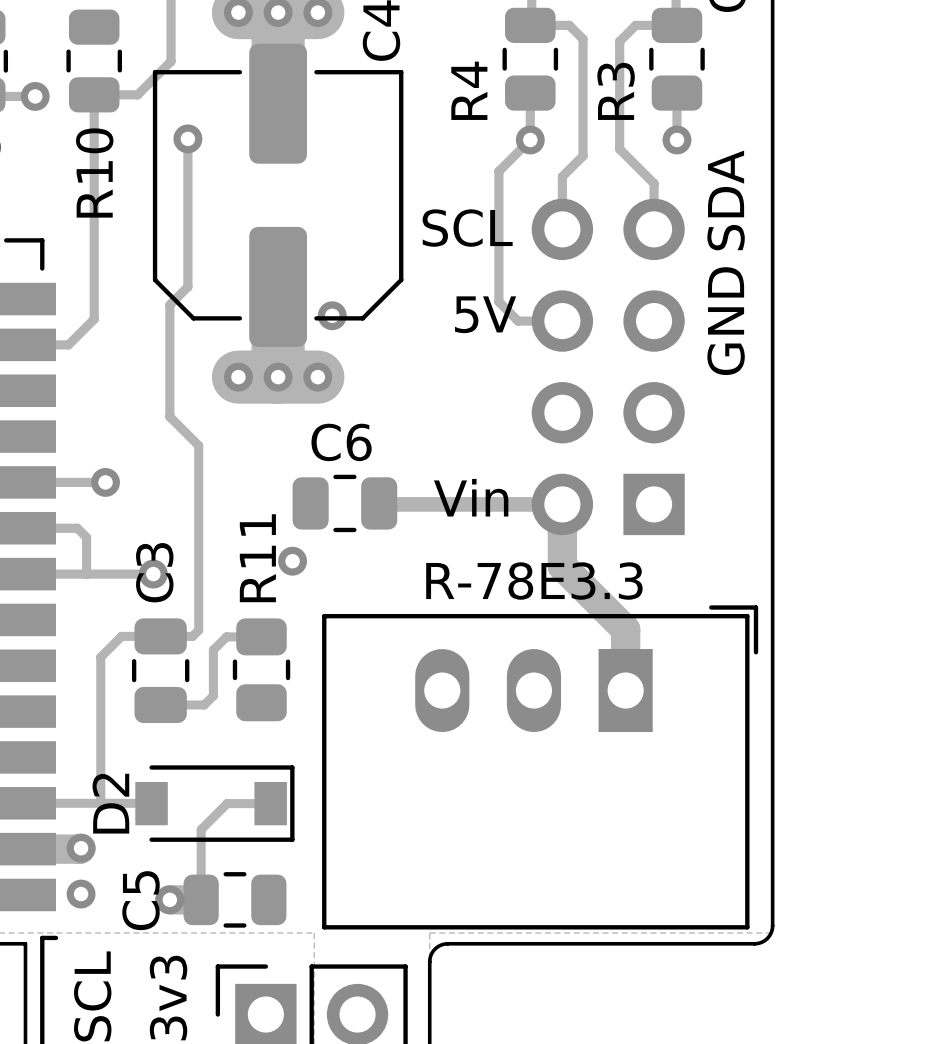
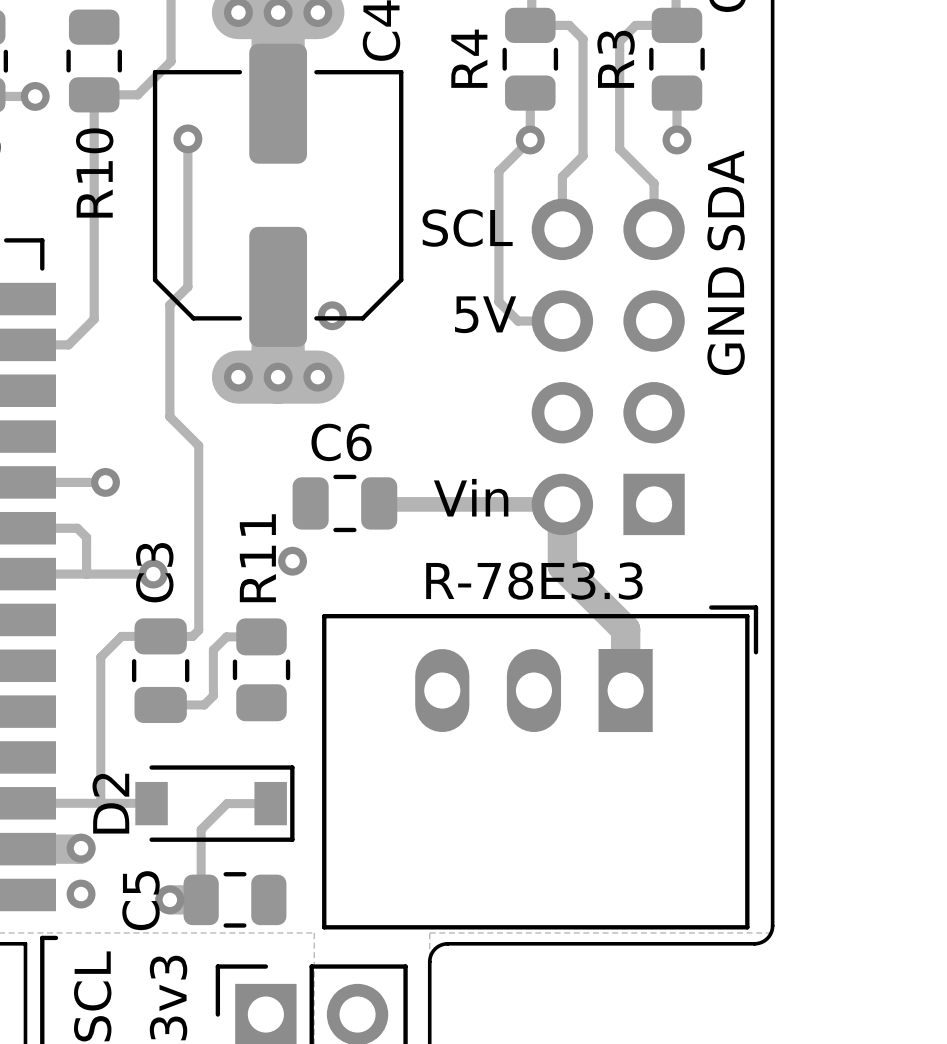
R4 name position: R4 (469, 90) -> R4 (469, 58)
R3 name position: R3 (616, 91) -> R3 (616, 59)

